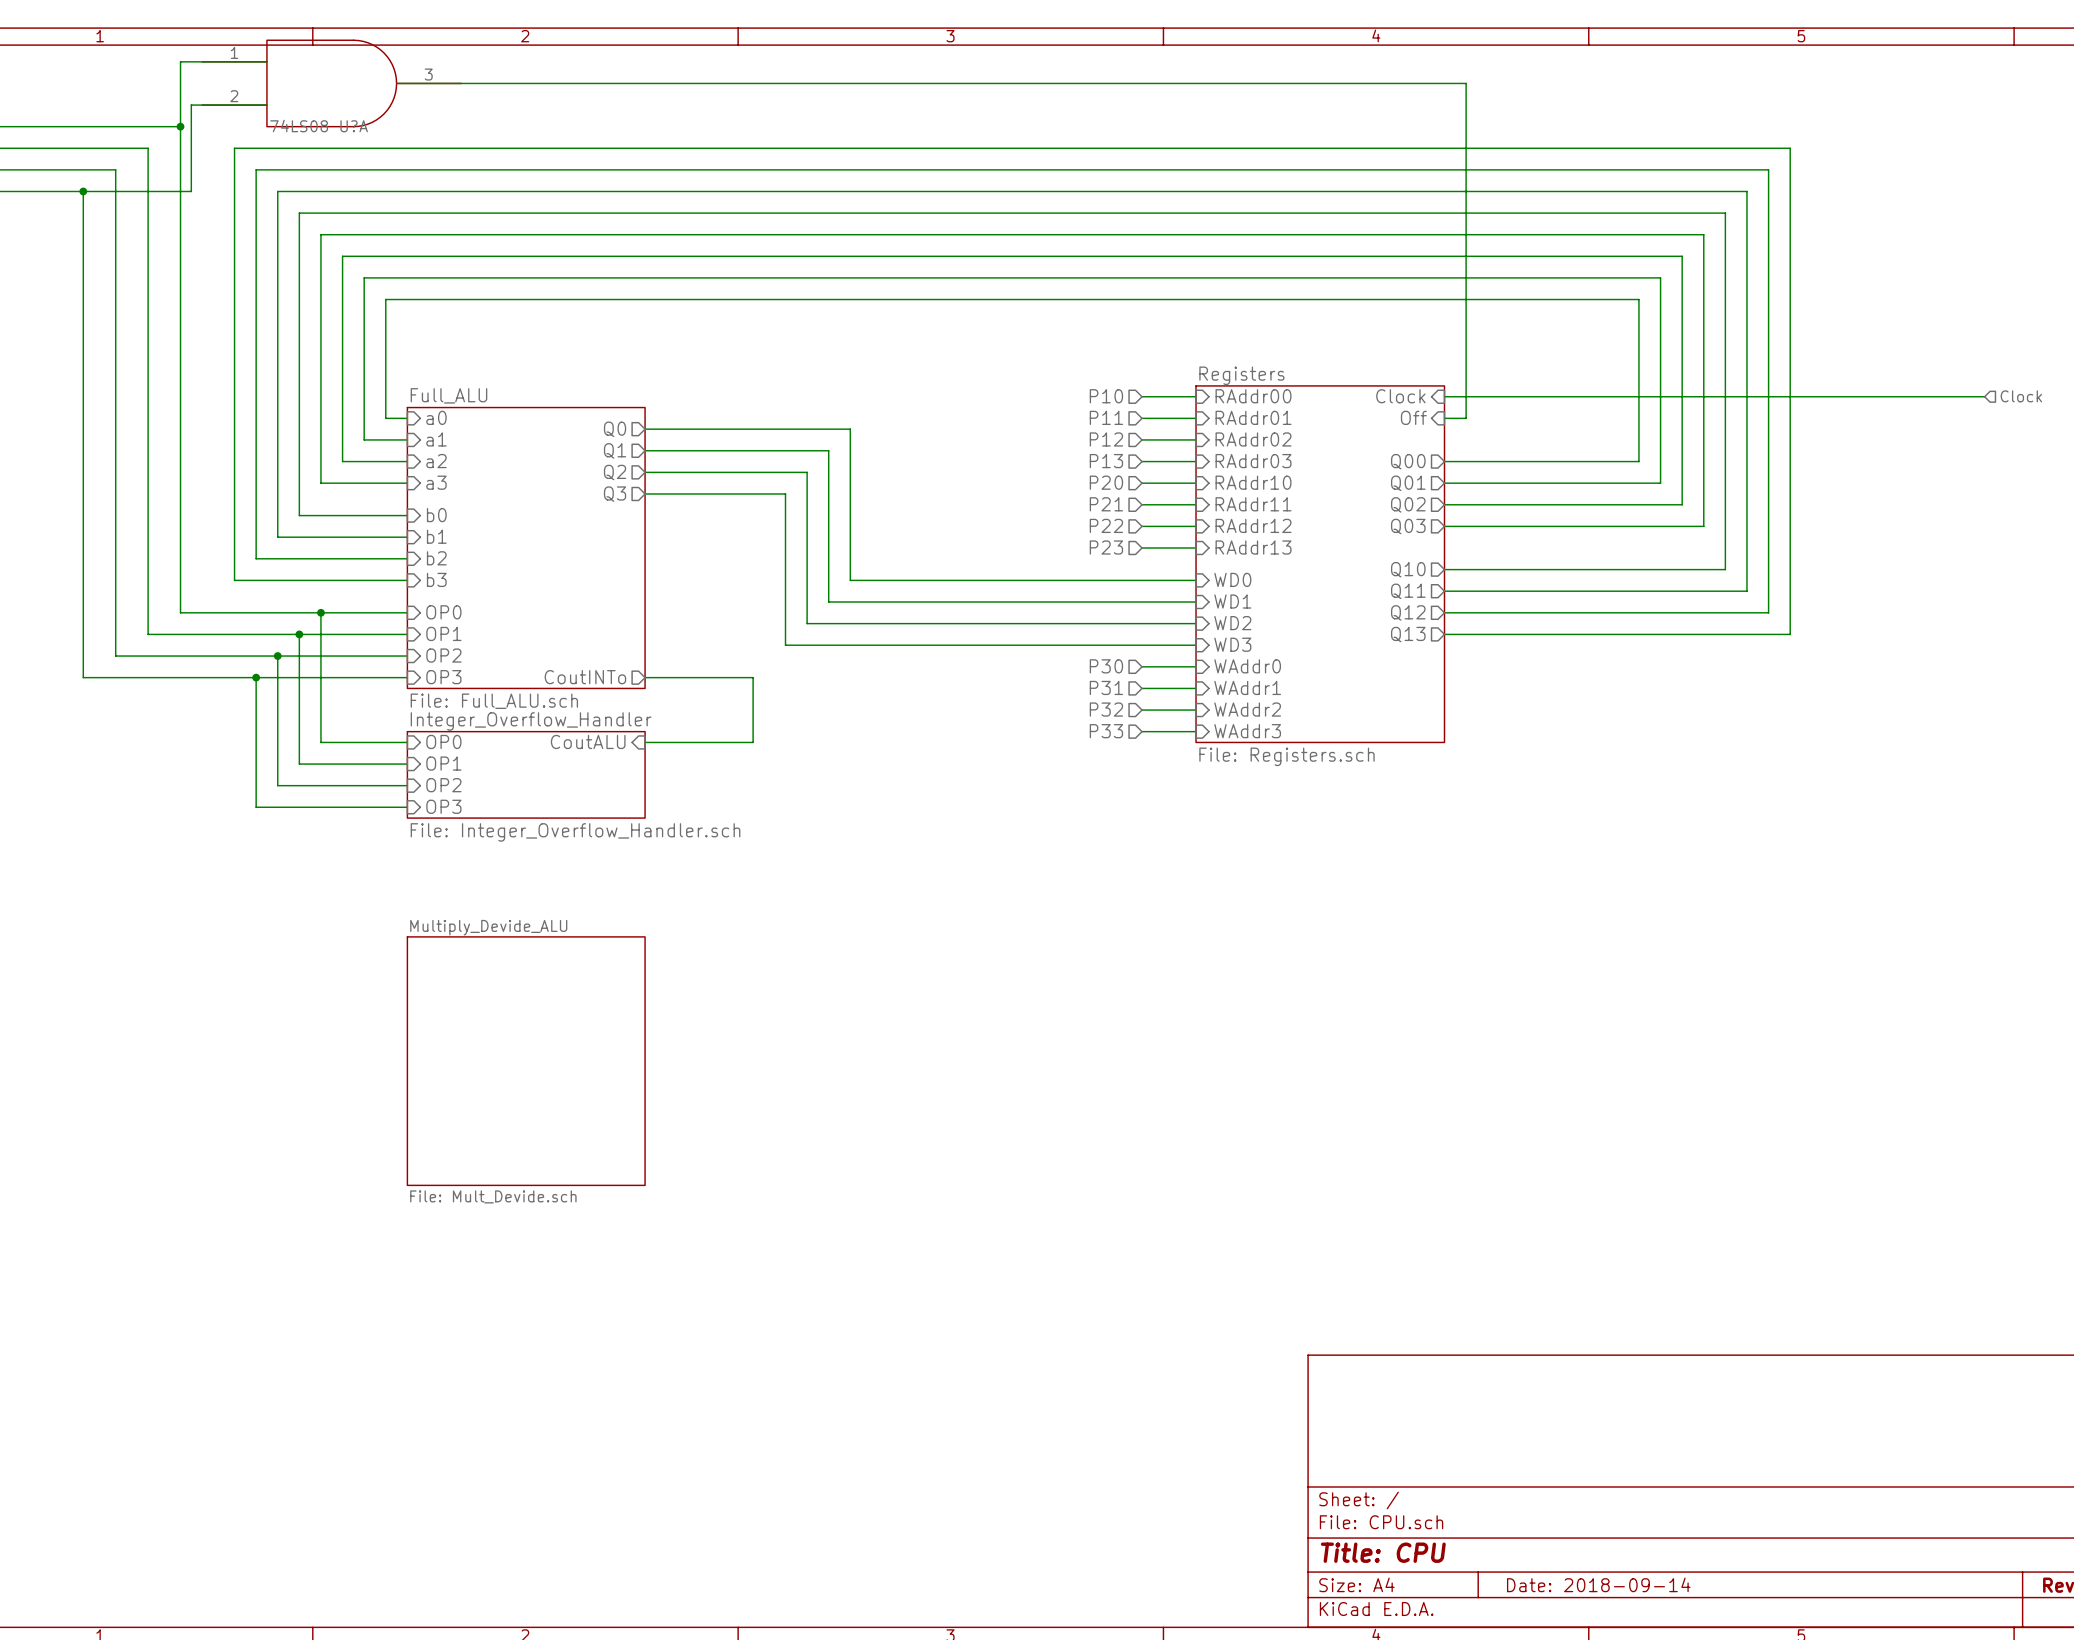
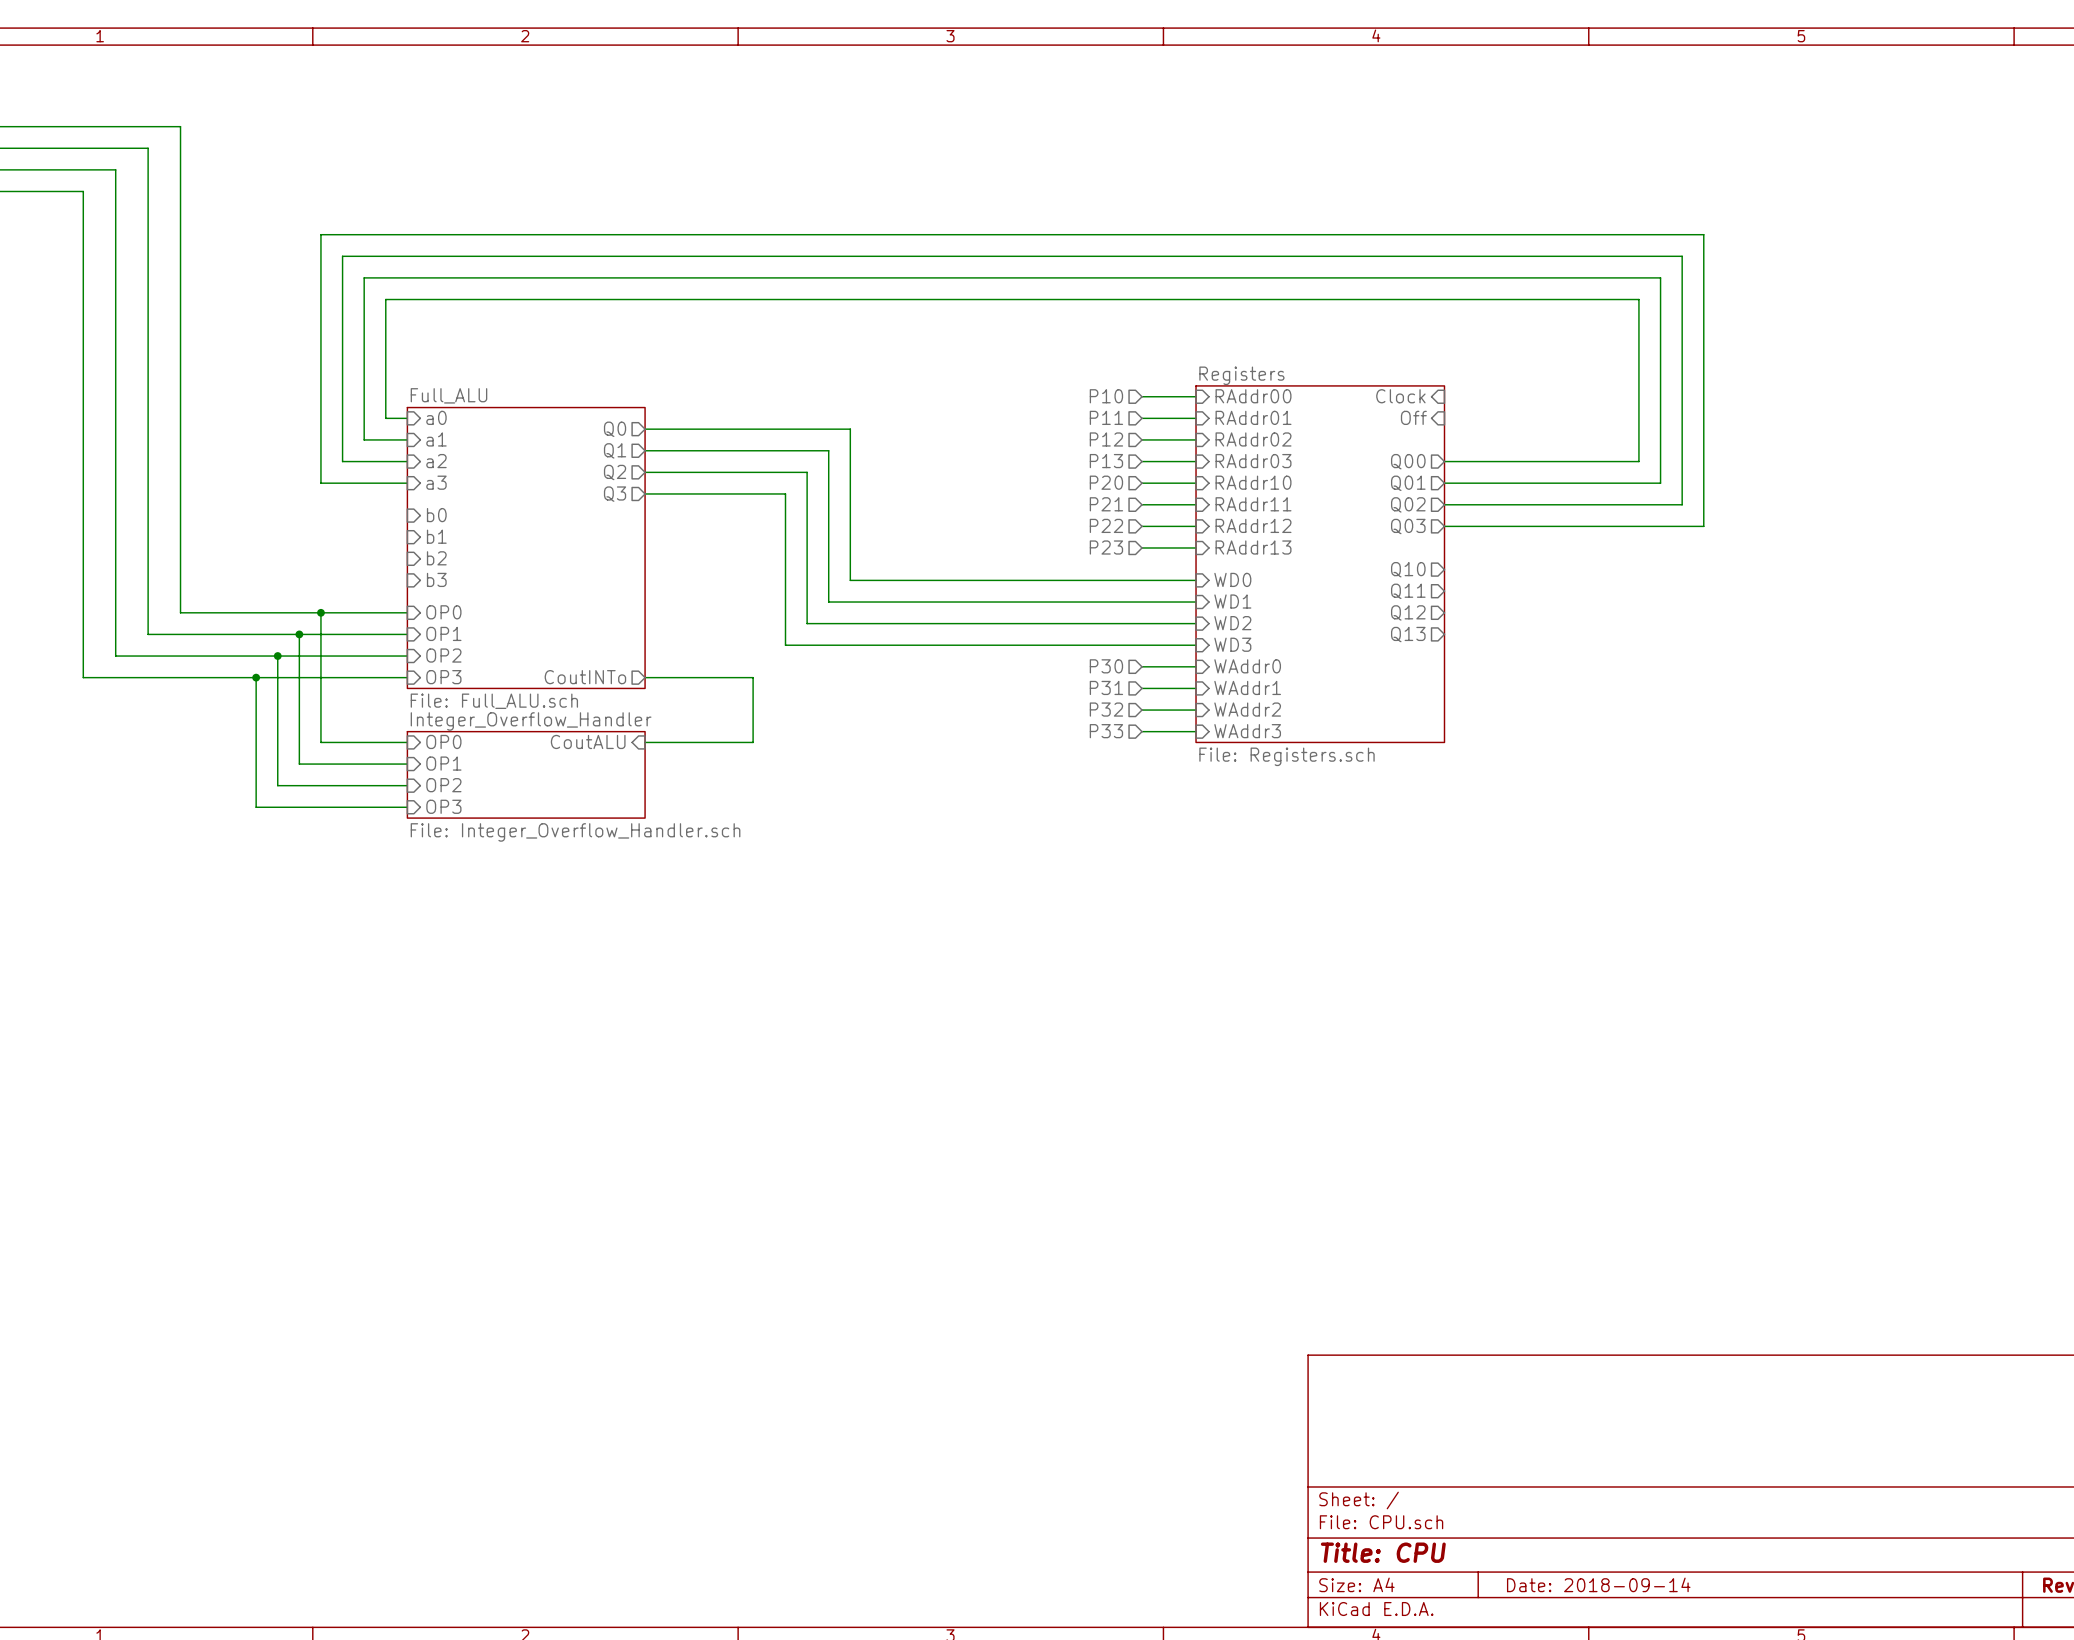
wire: (266, 61) (180, 61) (180, 126) -> none
U?A: 74LS08 (331, 83) -> none
wire: (396, 83) (1466, 83) (1466, 418) (1444, 418) -> none
wire: (266, 105) (191, 105) (191, 191) (83, 191) -> none
junction: (180, 126) -> none
junction: (83, 191) -> none
wire: (1444, 396) (1984, 396) -> none
hierarchical label: Clock (2021, 396) -> none
wire: (407, 515) (299, 515) (299, 213) (1725, 213) (1725, 569) (1444, 569) -> none
wire: (407, 537) (277, 537) (277, 191) (1746, 191) (1746, 591) (1444, 591) -> none
wire: (407, 558) (256, 558) (256, 169) (1768, 169) (1768, 612) (1444, 612) -> none
wire: (407, 580) (234, 580) (234, 148) (1790, 148) (1790, 634) (1444, 634) -> none
sheet Multiply_Devide_ALU: File: Mult_Devide.sch (526, 1061) -> none

